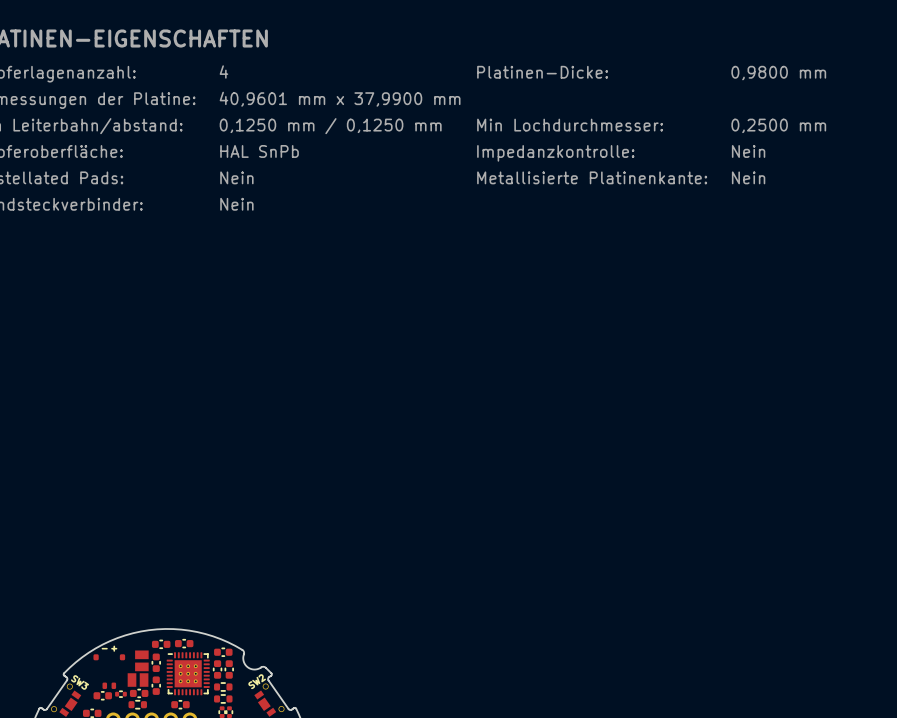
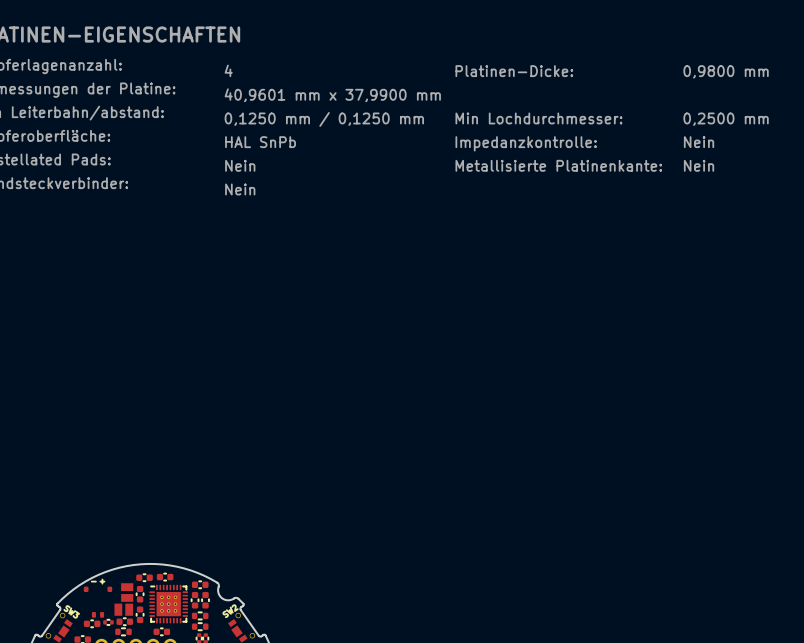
text position: 4 (223, 72) -> 4 (228, 70)
text position: Platinen-Dicke: (542, 72) -> Platinen-Dicke: (514, 71)
text position: 0,9800 mm (778, 73) -> 0,9800 mm (726, 71)
text position: 40,9601 mm x 37,9900 mm (340, 99) -> 40,9601 mm x 37,9900 mm (332, 95)
text position: Min Lochdurchmesser: (570, 125) -> Min Lochdurchmesser: (538, 118)
text position: 0,2500 mm (778, 125) -> 0,2500 mm (726, 119)
text position: 0,1250 mm / 0,1250 mm (330, 126) -> 0,1250 mm / 0,1250 mm (324, 119)
text position: HAL SnPb (259, 151) -> HAL SnPb (260, 142)
text: Nein (748, 151) -> none
text position: Impedanzkontrolle: (555, 153) -> Impedanzkontrolle: (526, 143)
text: none -> Nein (699, 142)
text: Nein (236, 177) -> none
text position: Metallisierte Platinenkante: (592, 177) -> Metallisierte Platinenkante: (558, 165)
text: Nein (748, 177) -> none
text: none -> Nein (240, 165)
text: none -> Nein (699, 165)
text: Nein (236, 204) -> none
text: none -> Nein (240, 189)

